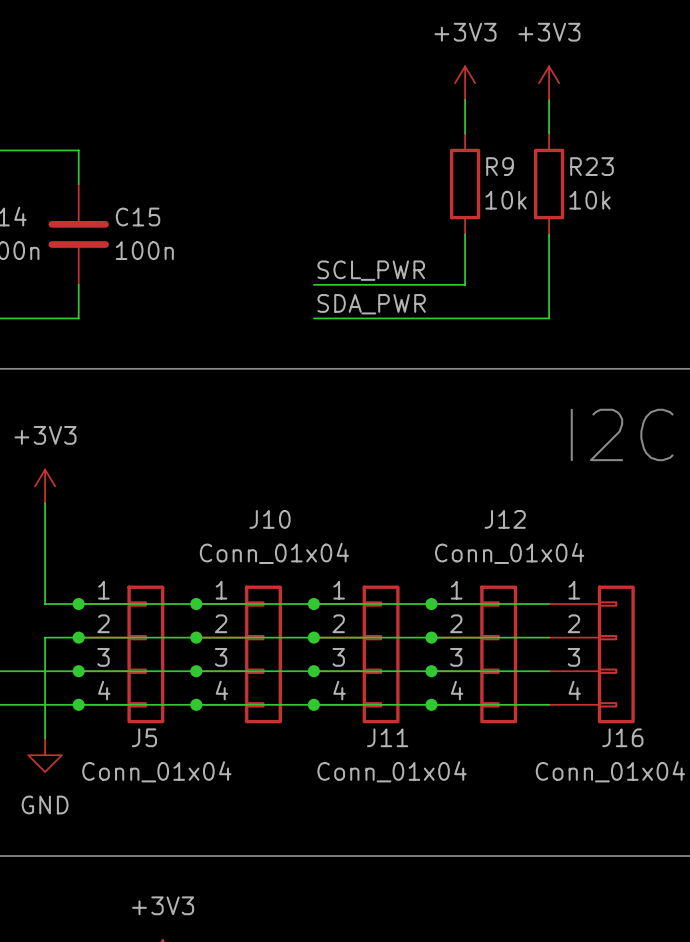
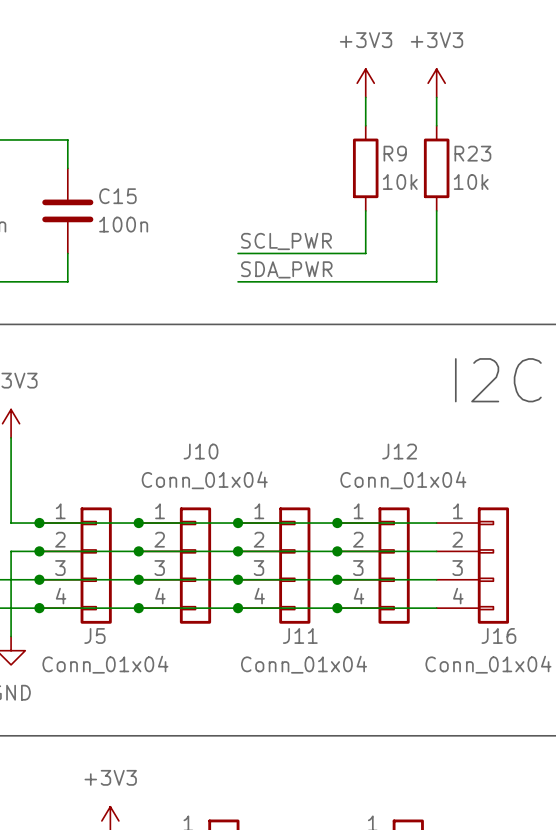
wire: (78, 150) (78, 184) -> (39, 139) (67, 139) (67, 168)
C15 position: (78, 234) -> (67, 210)
wire: (78, 284) (78, 318) -> (67, 253) (67, 281) (39, 281)

